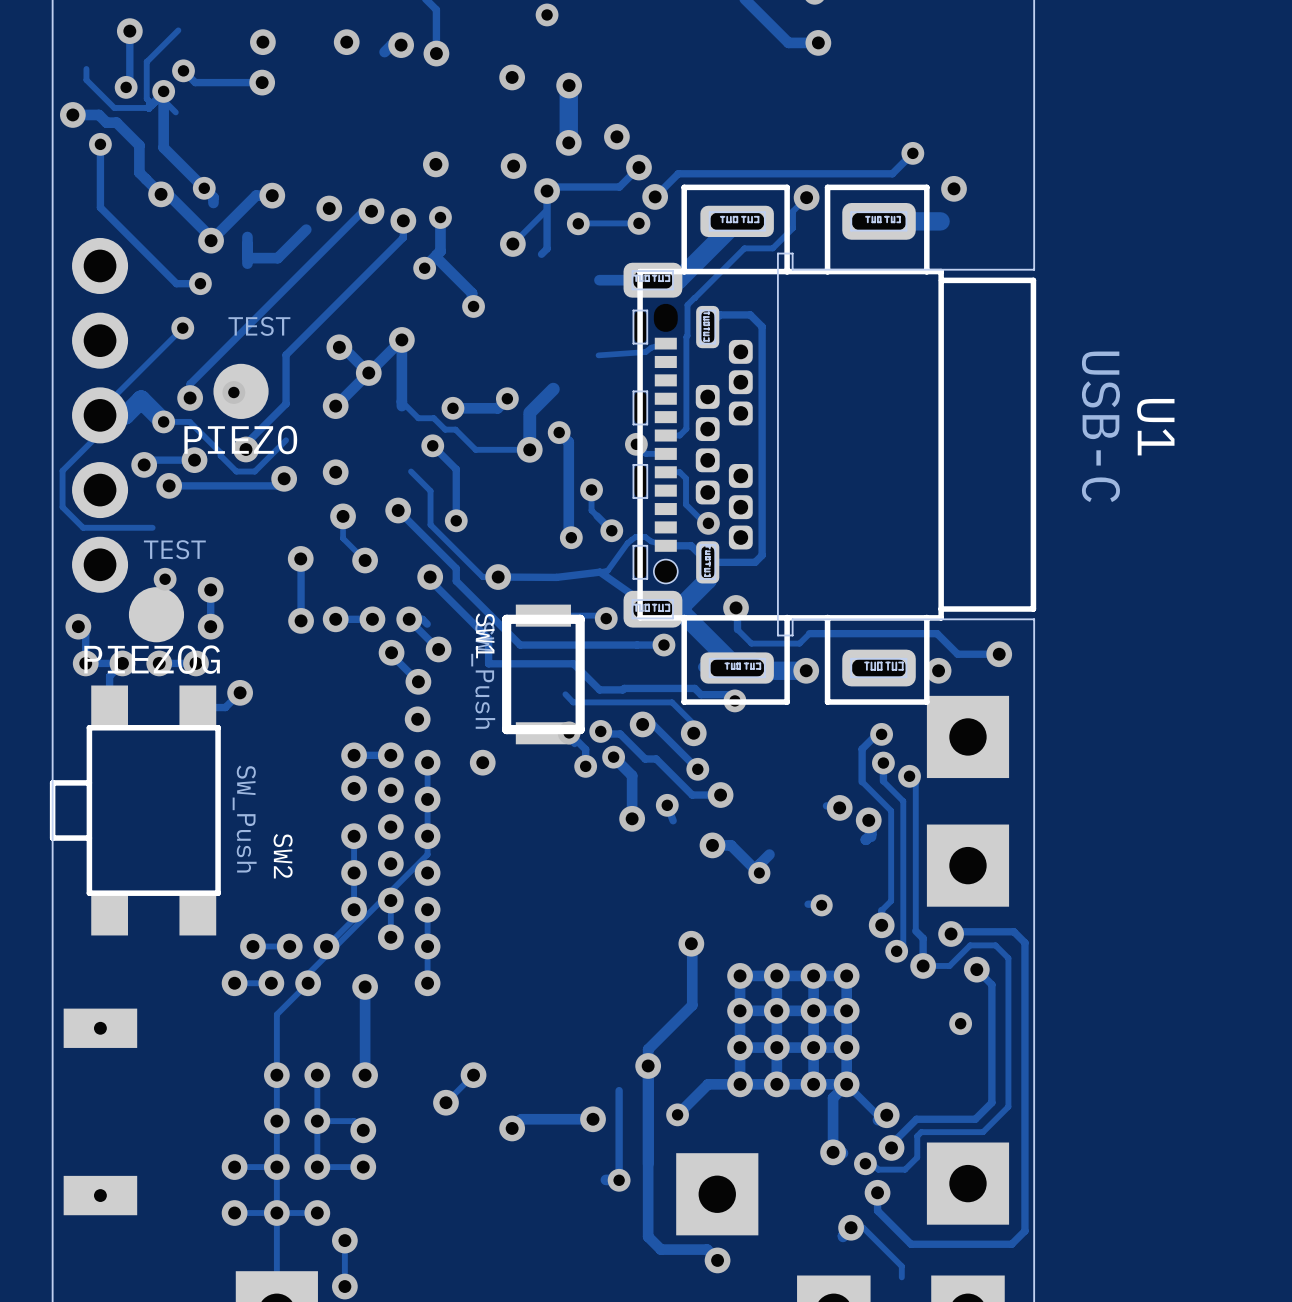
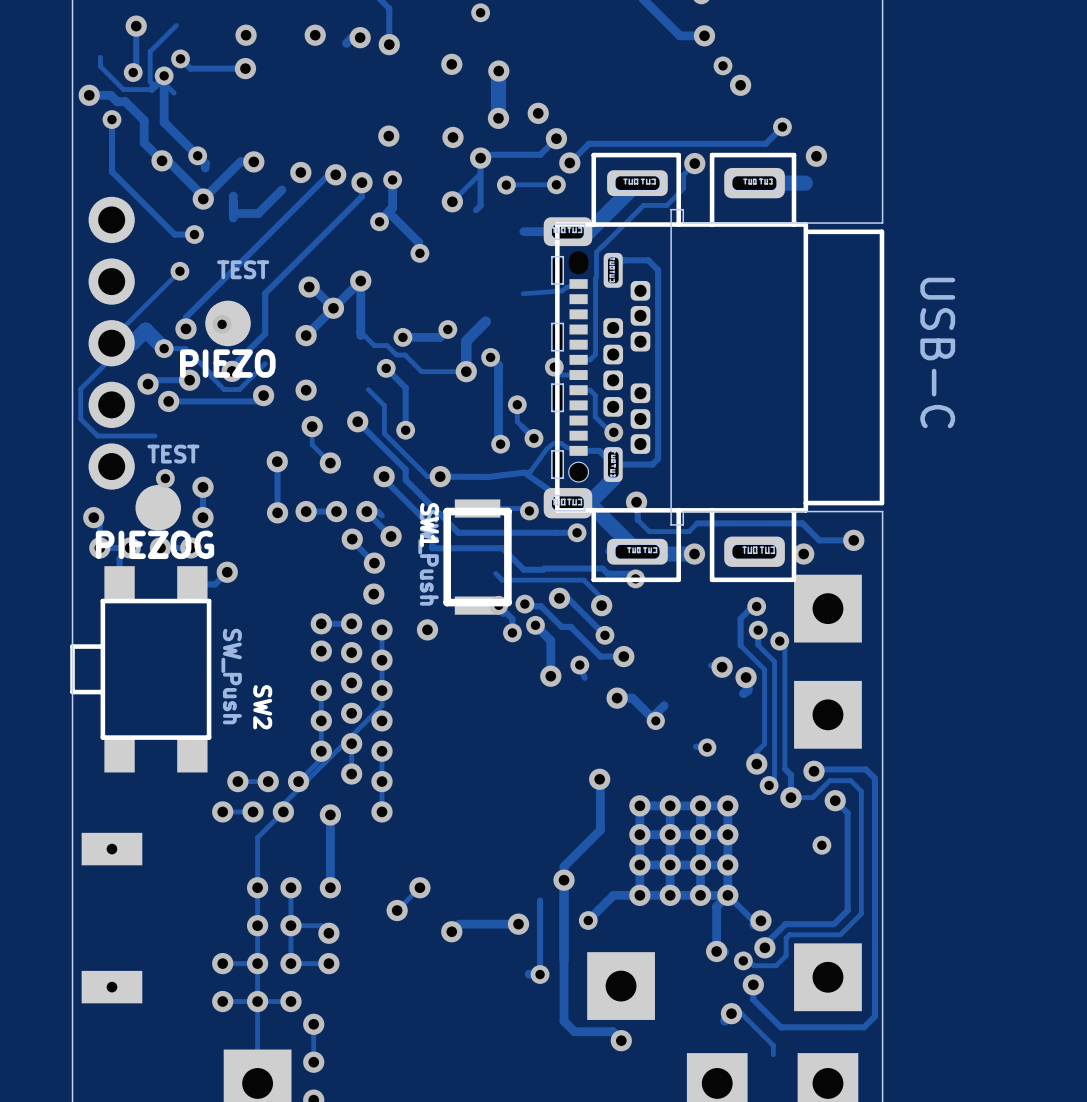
via: none -> (723, 65)
via: none -> (740, 85)
U1 name: U1 (1155, 427) -> none

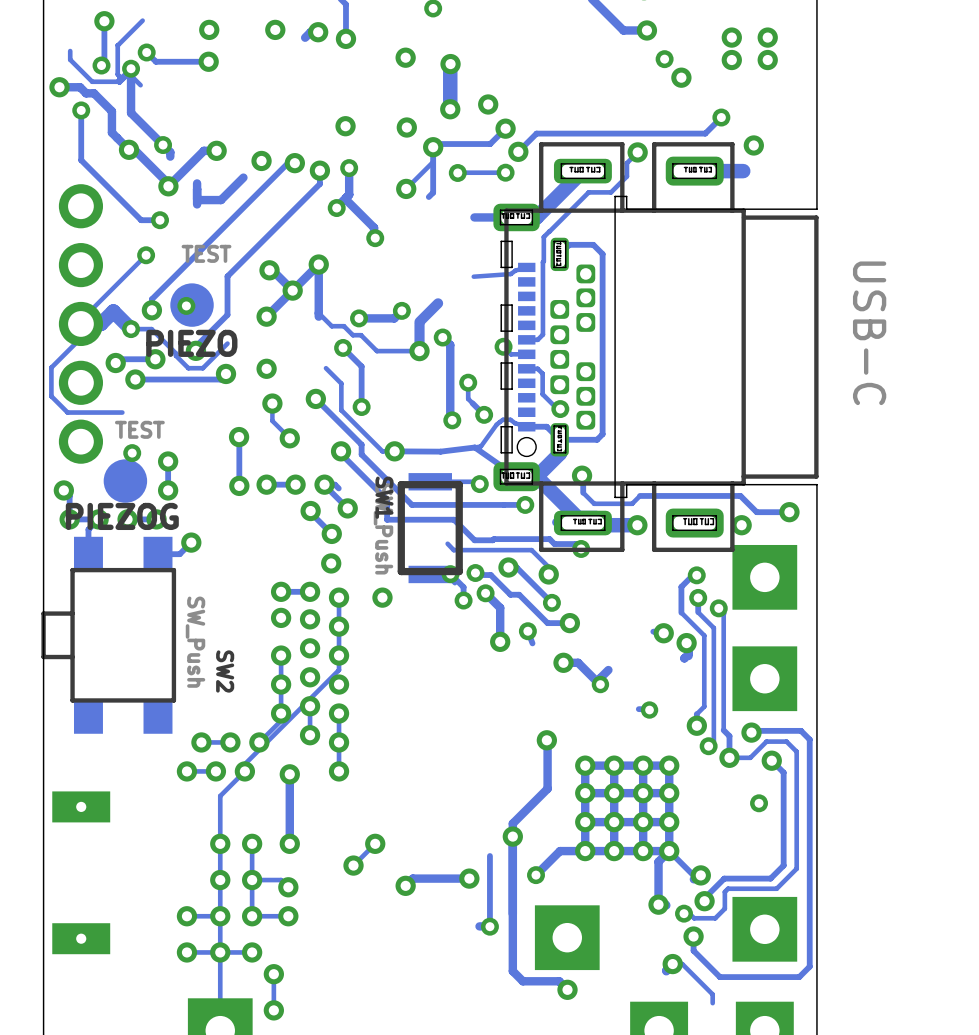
via: none -> (731, 37)
via: none -> (767, 37)
via: none -> (731, 60)
via: none -> (767, 60)

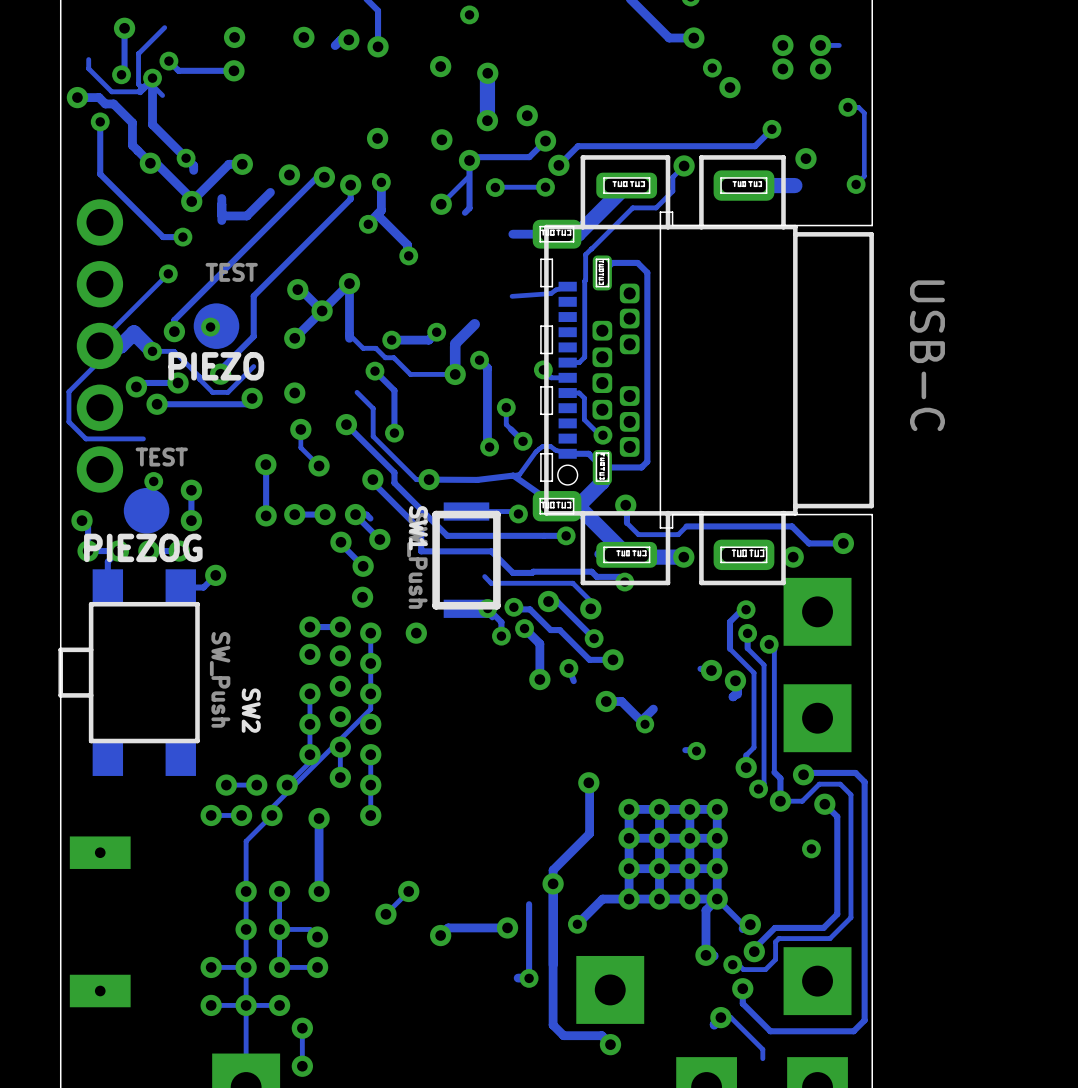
track: none -> (839, 45) (820, 45)
track: none -> (847, 107) (858, 107) (864, 113) (864, 176) (856, 184)
via: none -> (847, 107)
via: none -> (856, 184)

